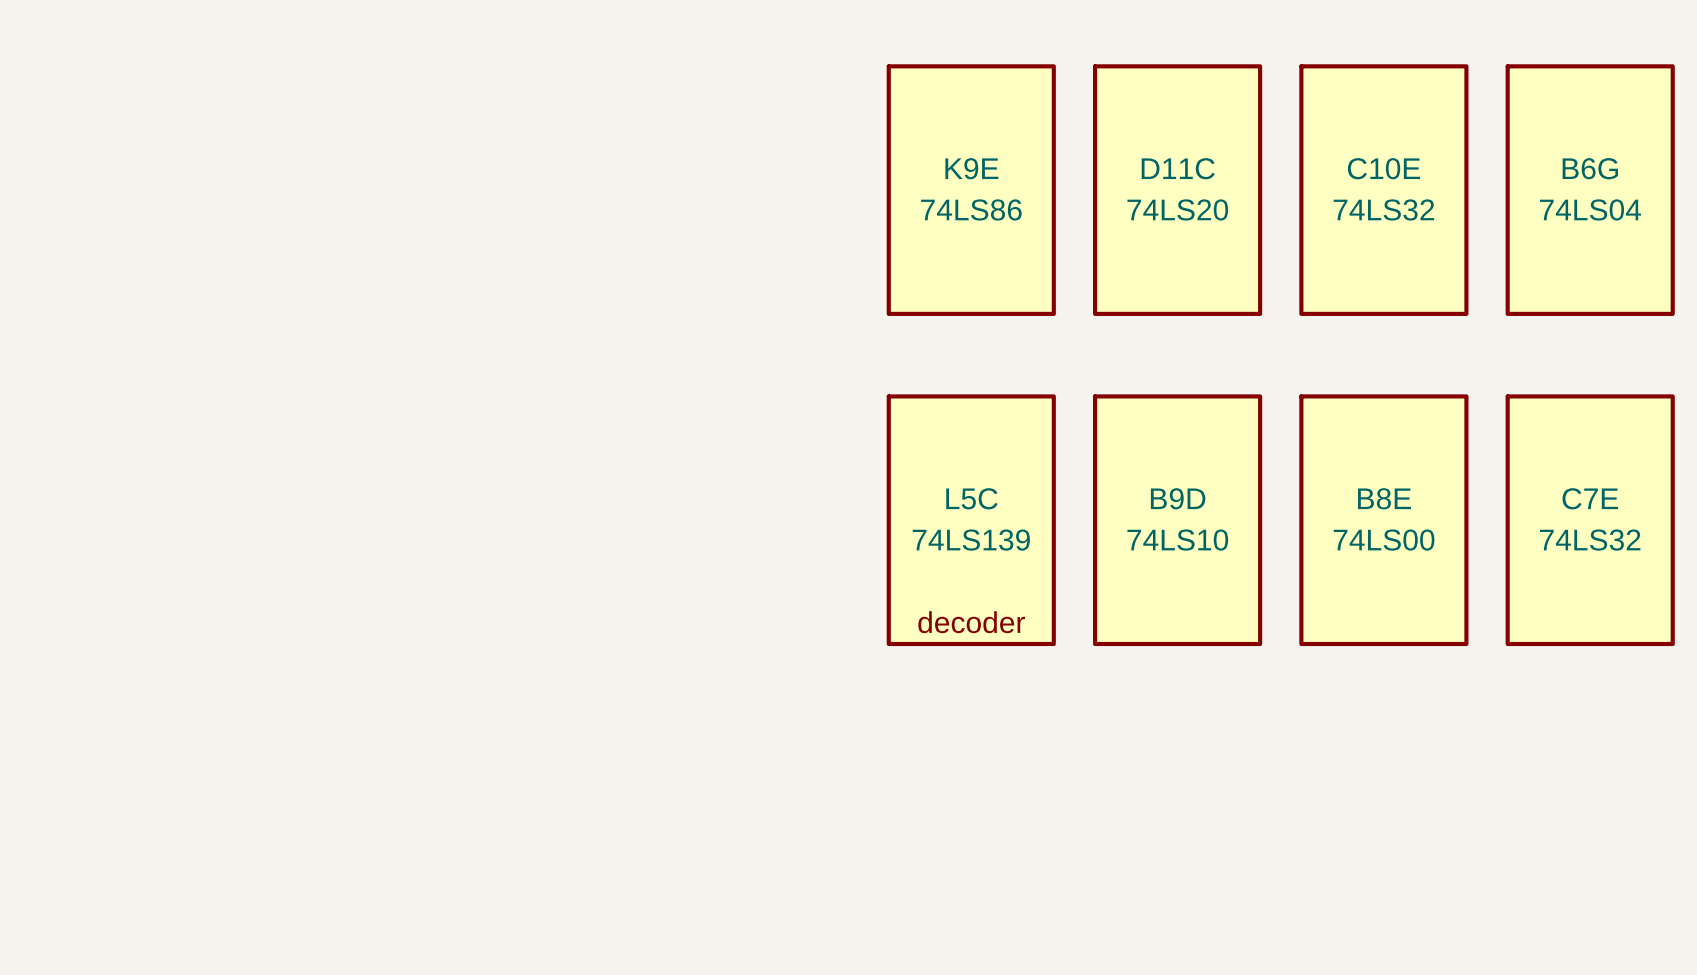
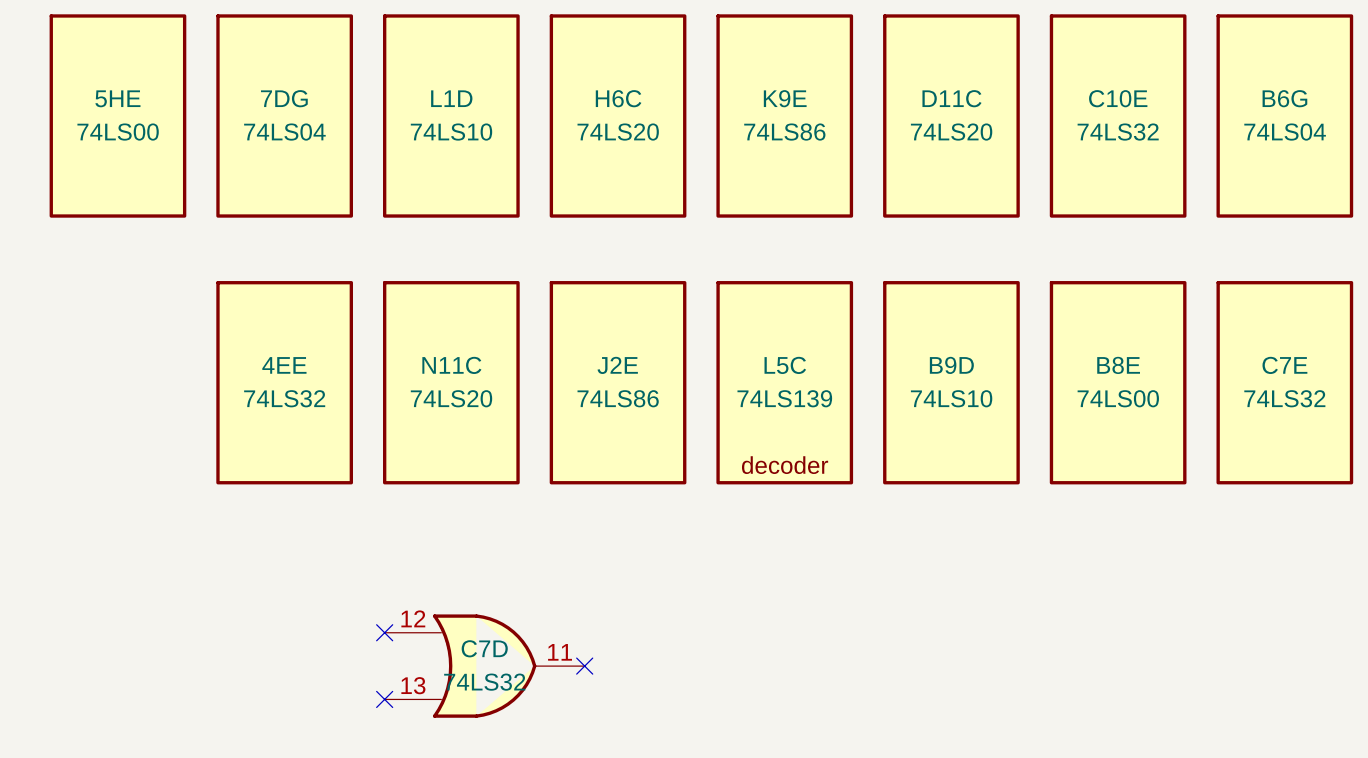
5HE: none -> 74LS00 (117, 115)
7DG: none -> 74LS04 (284, 115)
L1D: none -> 74LS10 (451, 115)
H6C: none -> 74LS20 (618, 115)
4EE: none -> 74LS32 (284, 382)
N11C: none -> 74LS20 (451, 382)
J2E: none -> 74LS86 (618, 382)
no-connect mark: none -> (384, 632)
C7D: none -> 74LS32 (484, 666)
no-connect mark: none -> (584, 666)
no-connect mark: none -> (384, 699)

